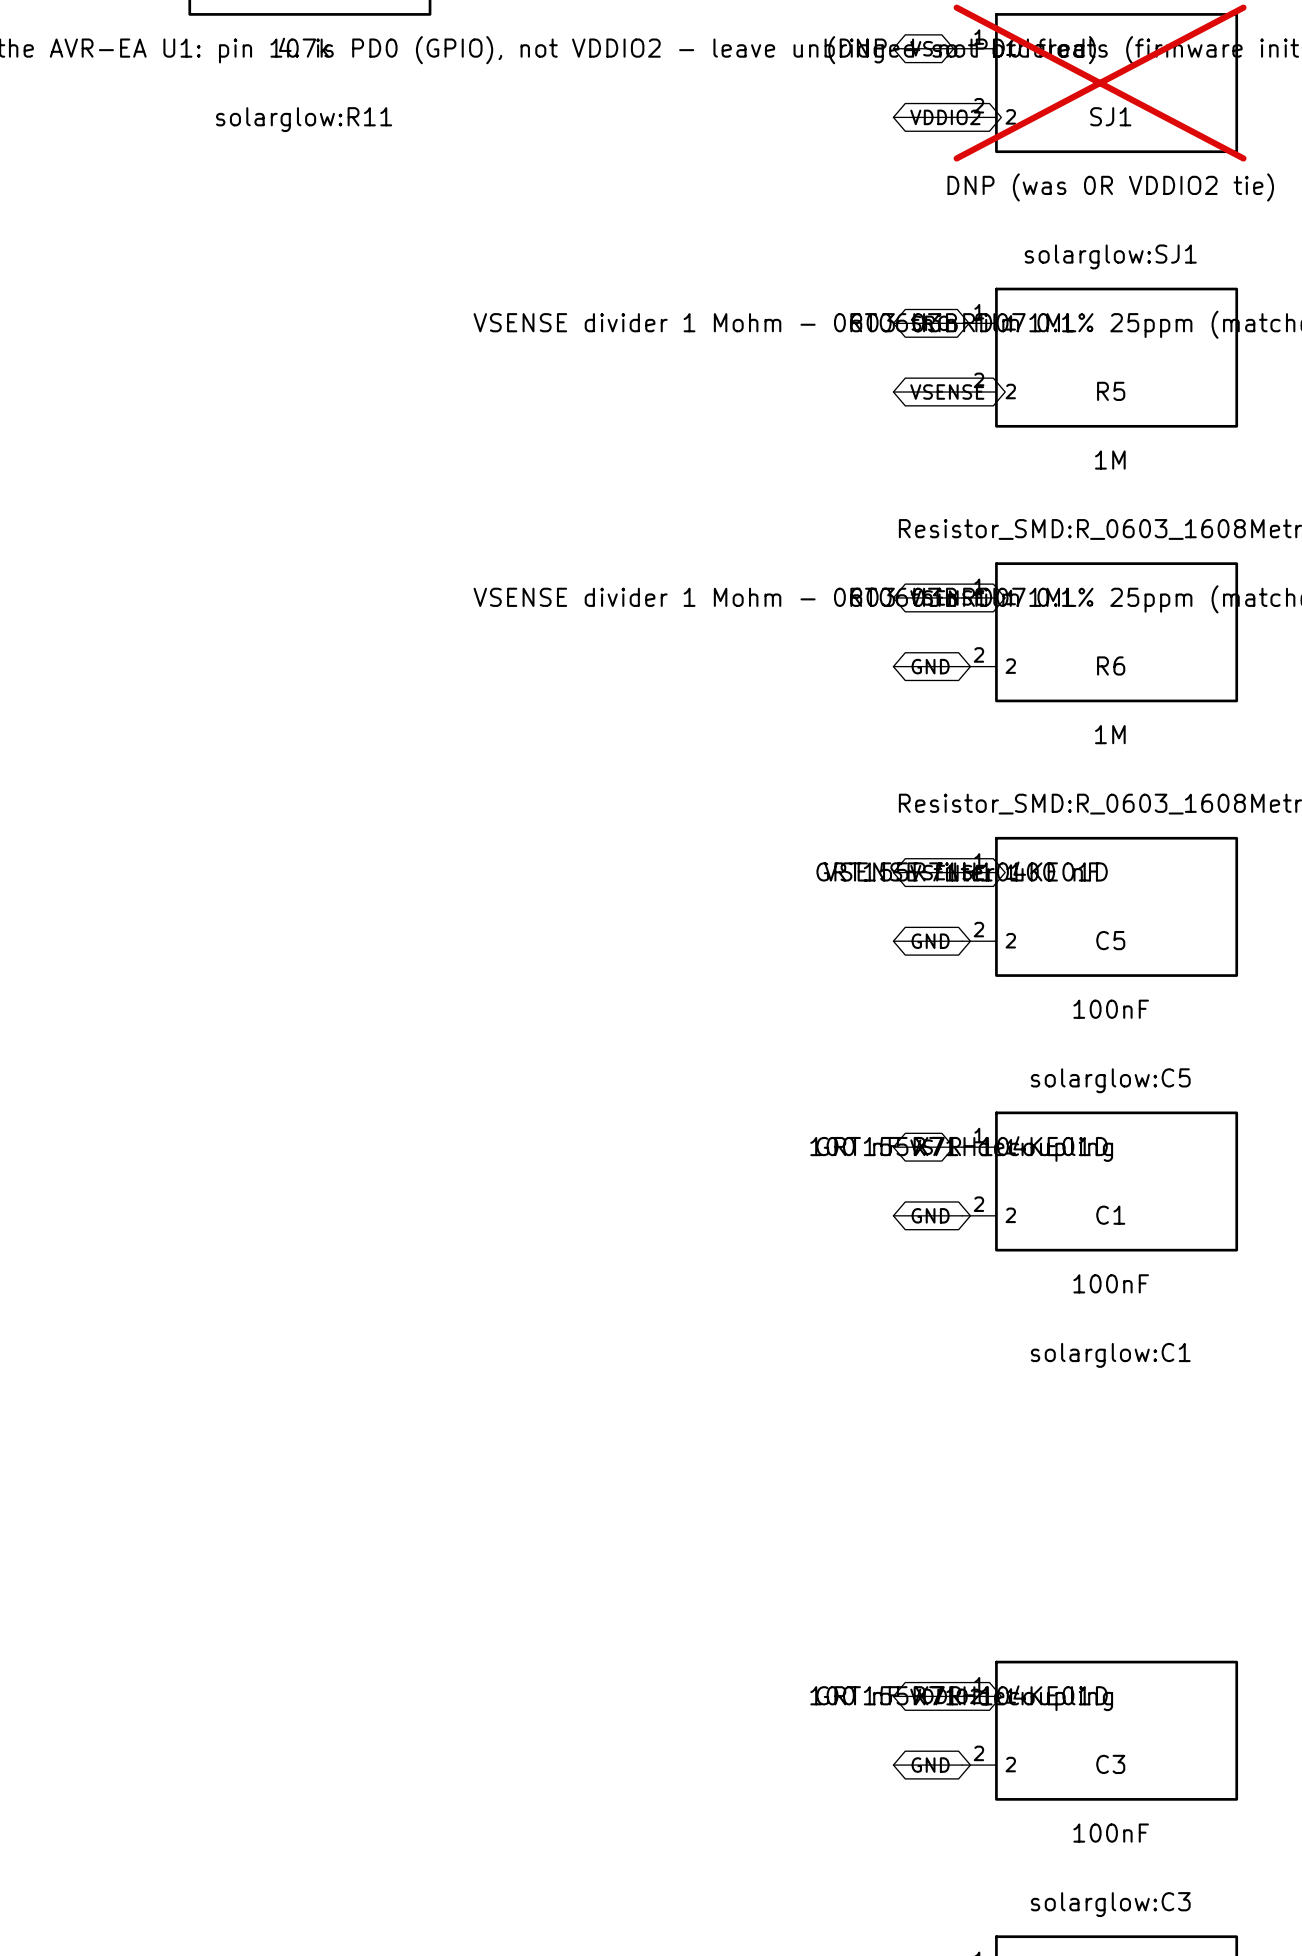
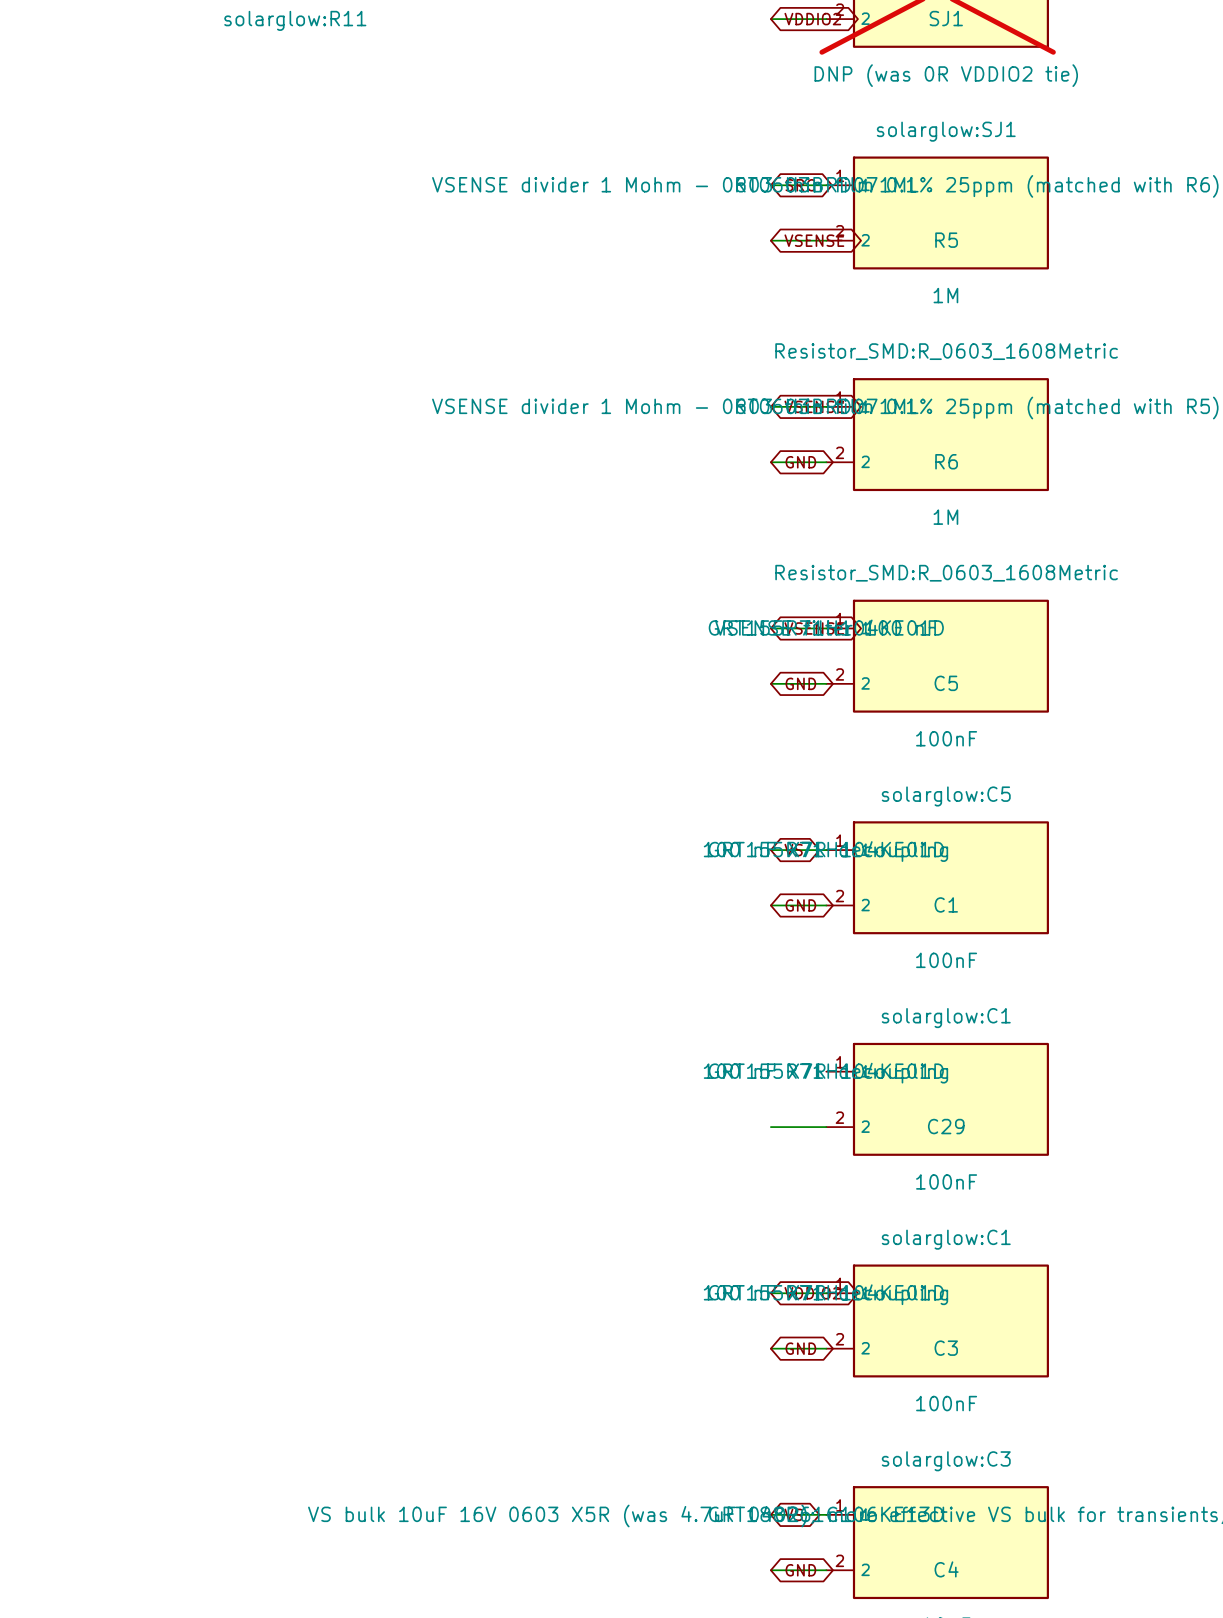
C29: none -> 100nF (937, 1099)
wire: none -> (770, 1127) (826, 1127)

